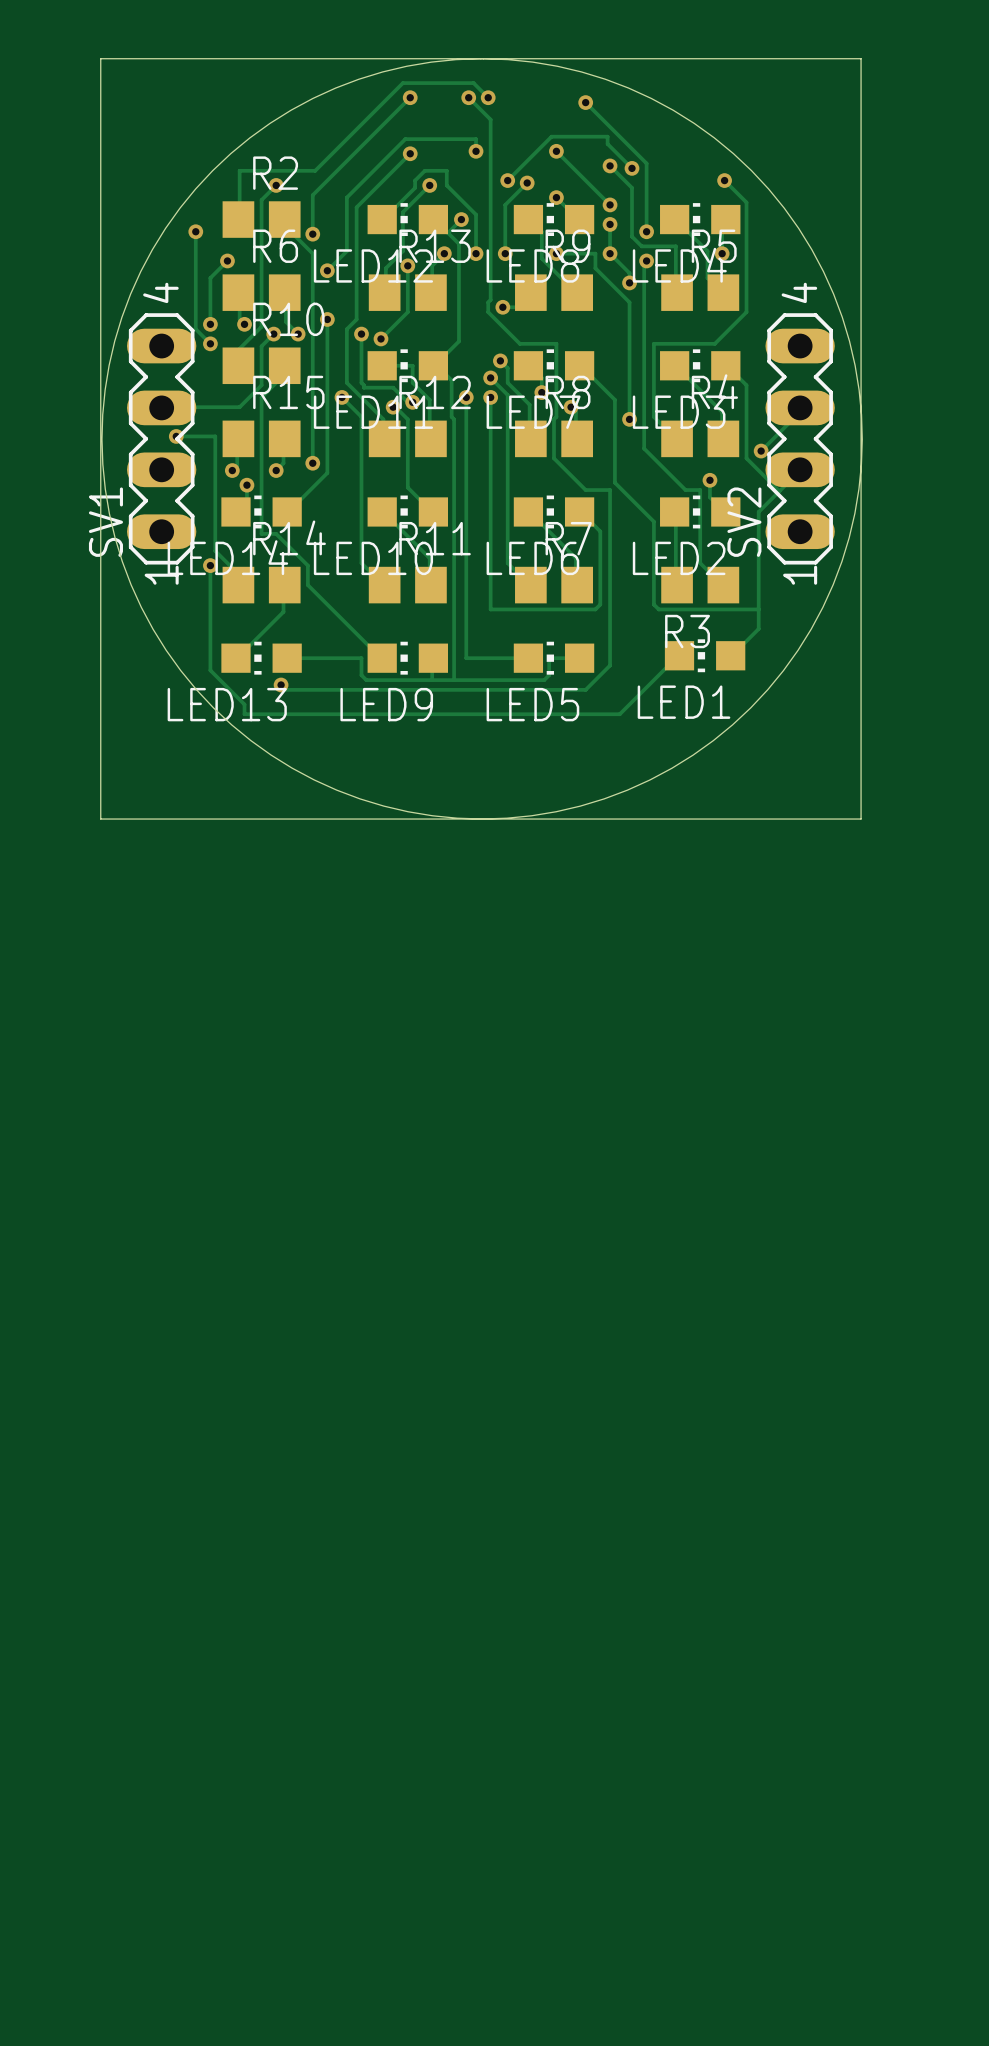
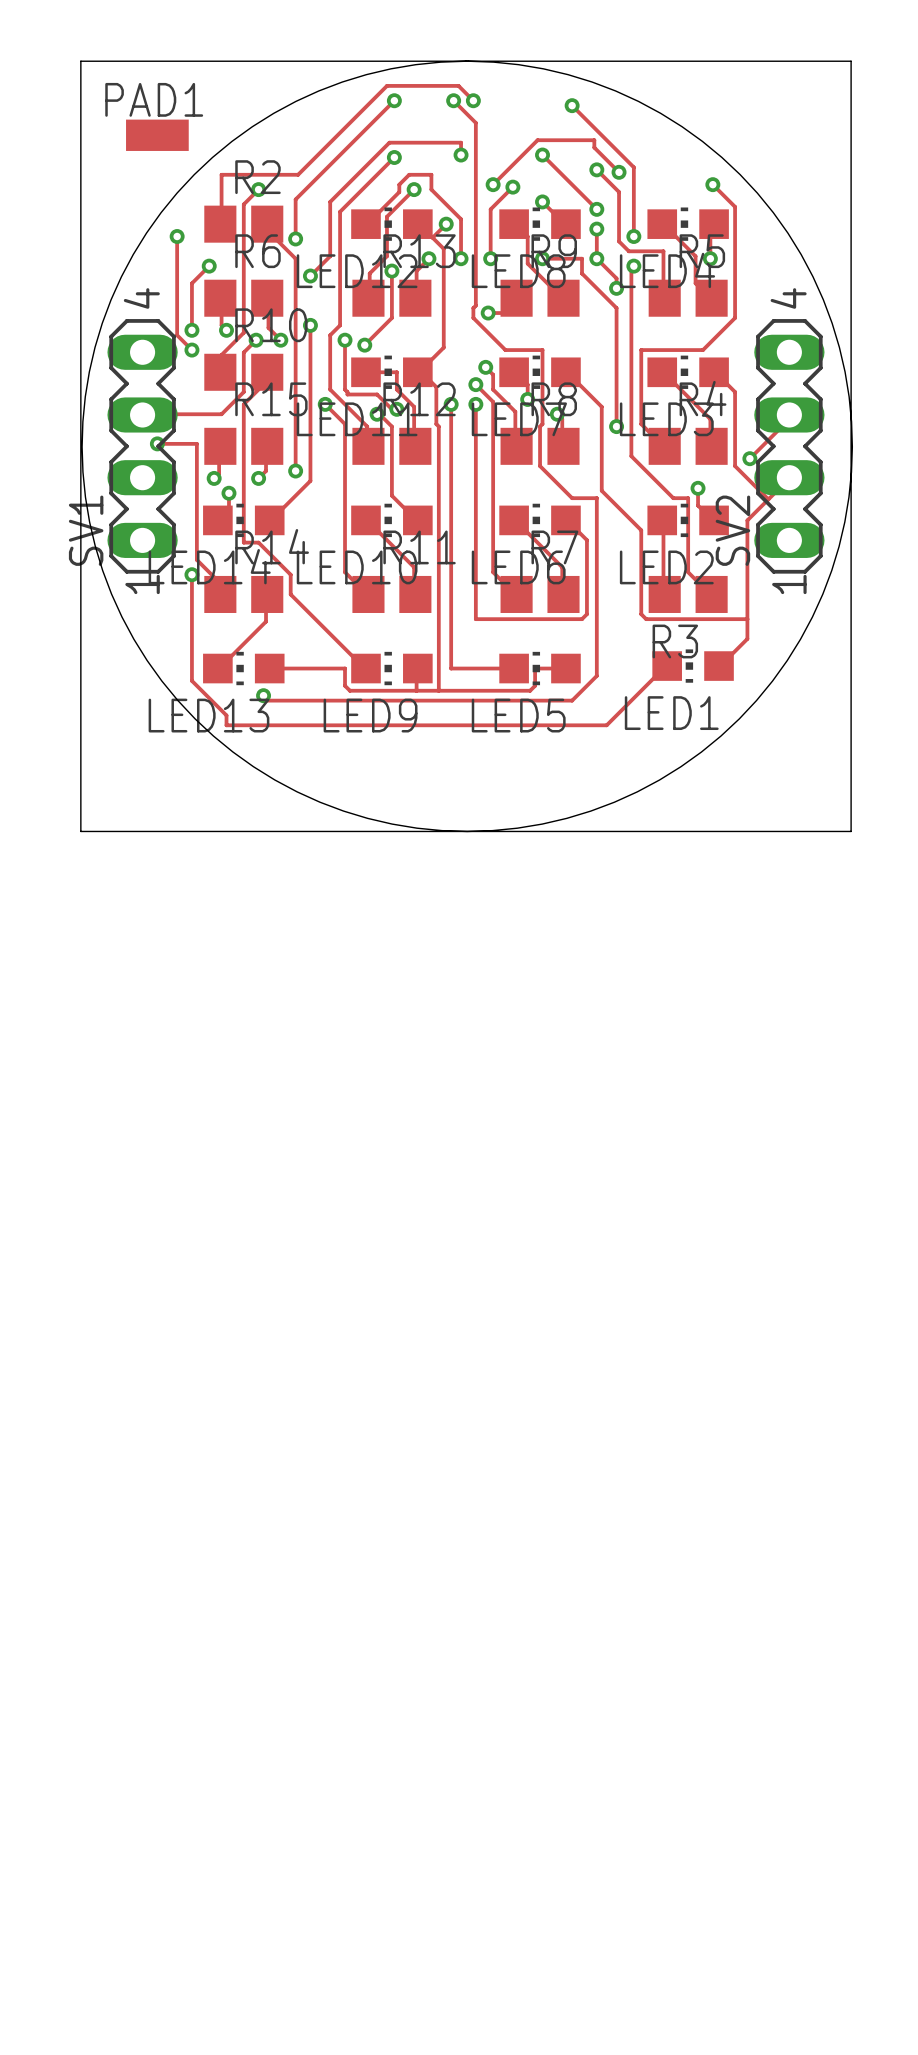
PAD1: none -> (157, 135)

